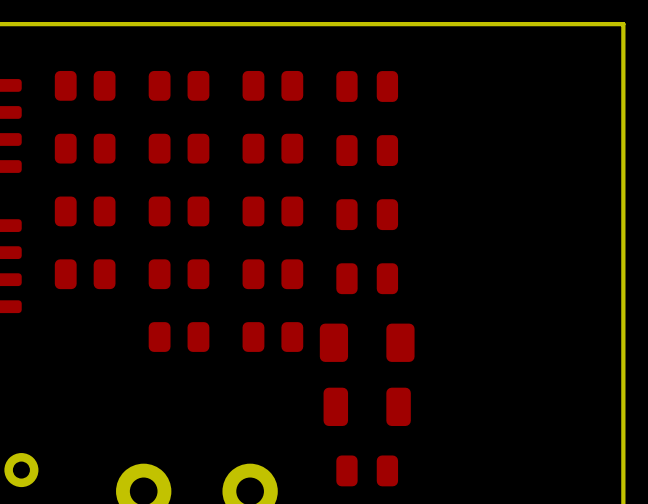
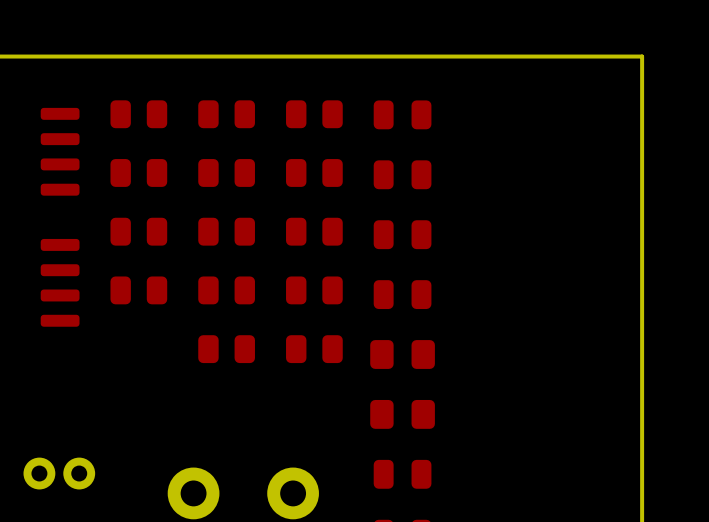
part footprint: [319, 323, 415, 362] -> [370, 340, 435, 369]
part footprint: [323, 387, 411, 427] -> [370, 399, 435, 429]

